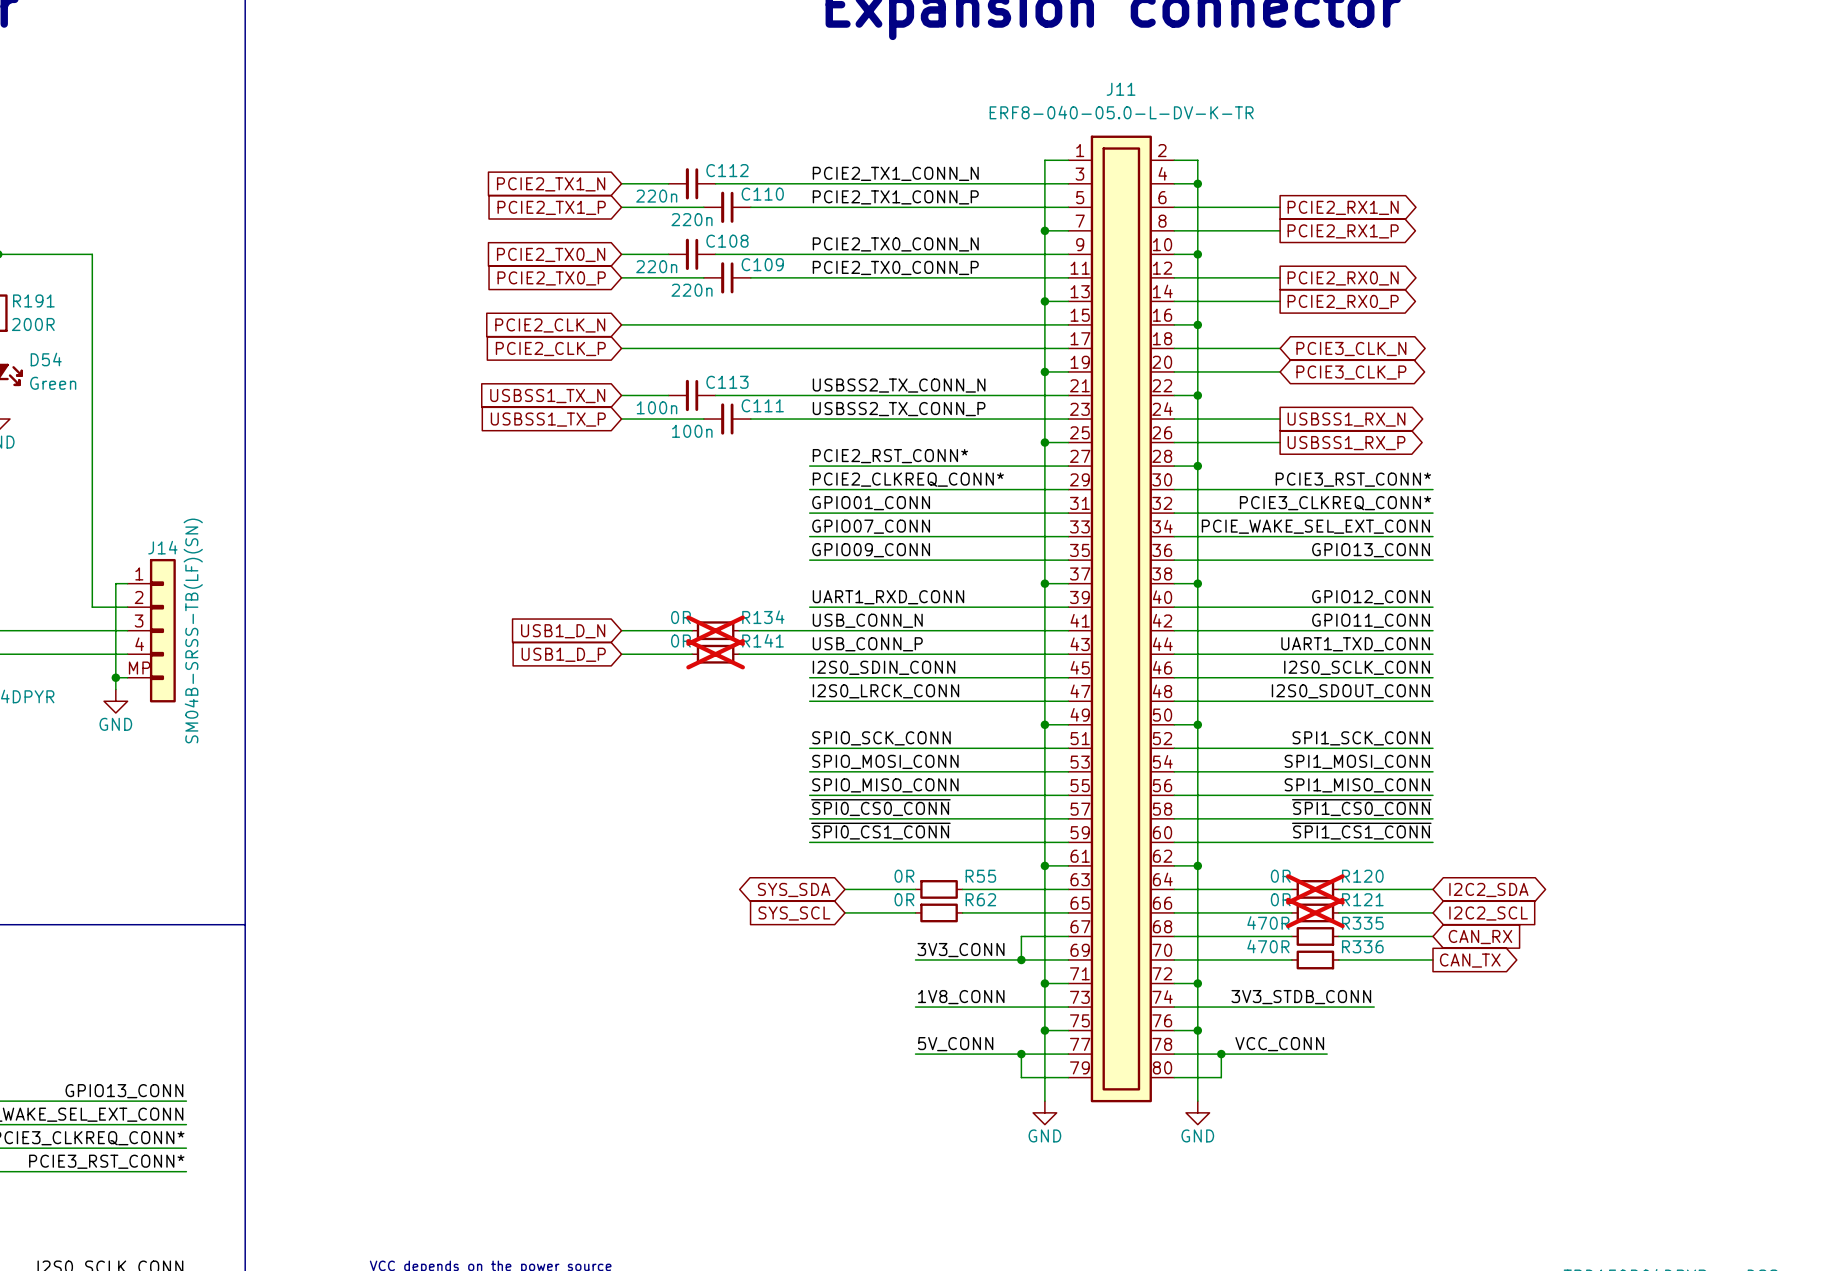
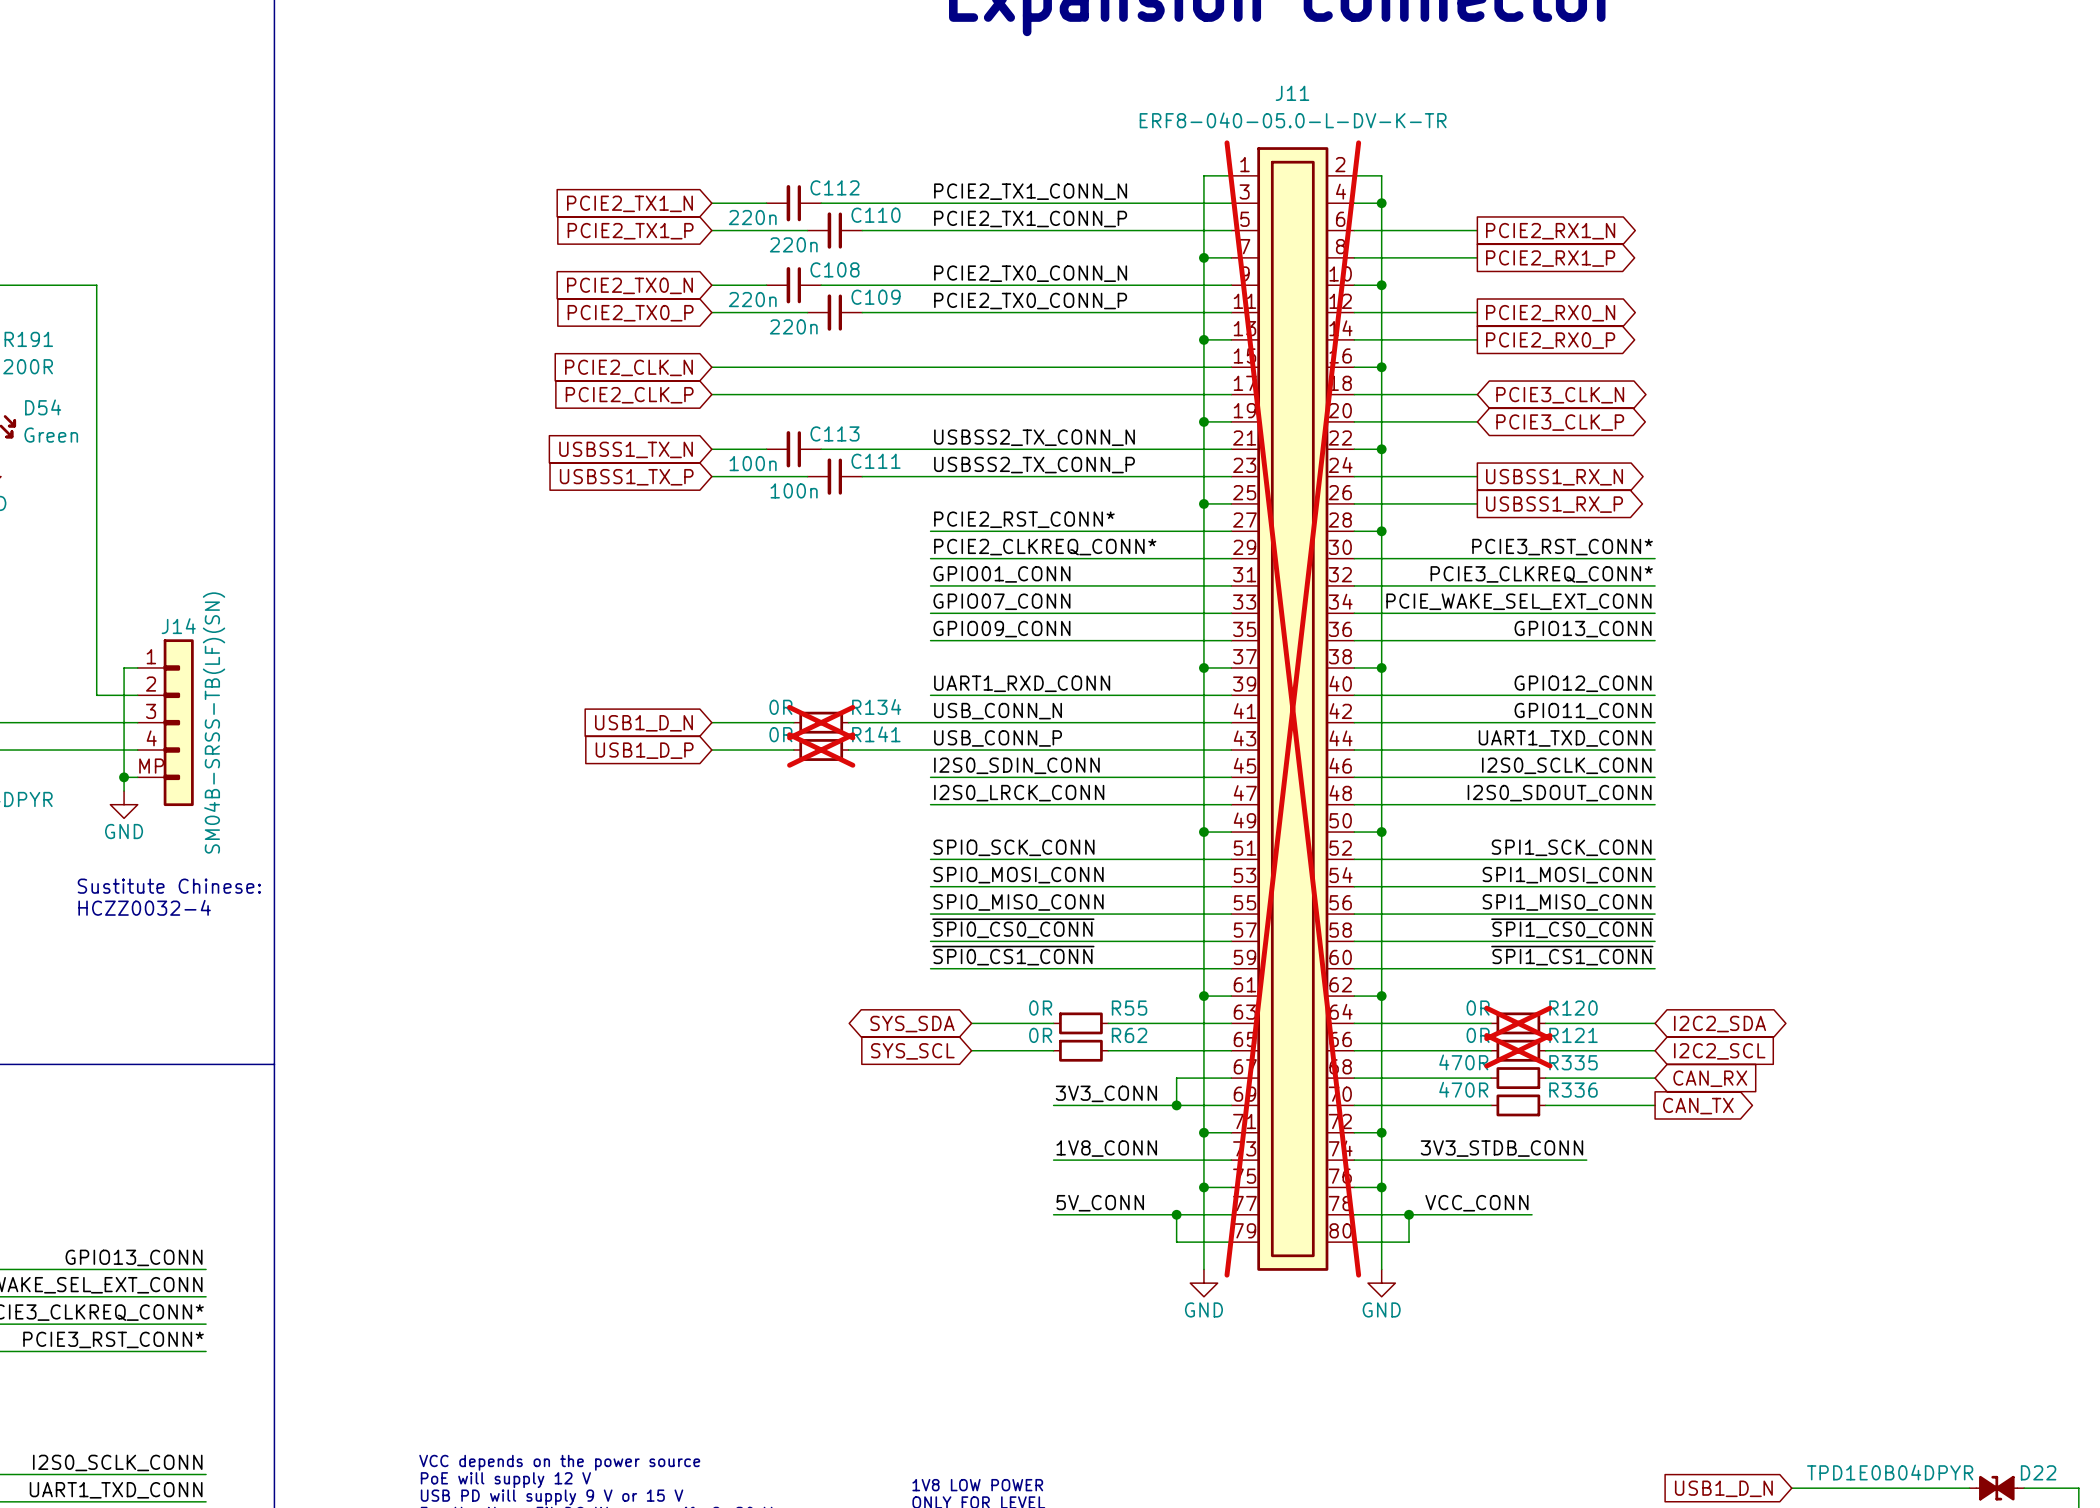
J11 do-not-place cross: none -> (1292, 708)
text: none -> Sustitute Chinese: (169, 886)
text: none -> HCZZ0032-4 (144, 907)

